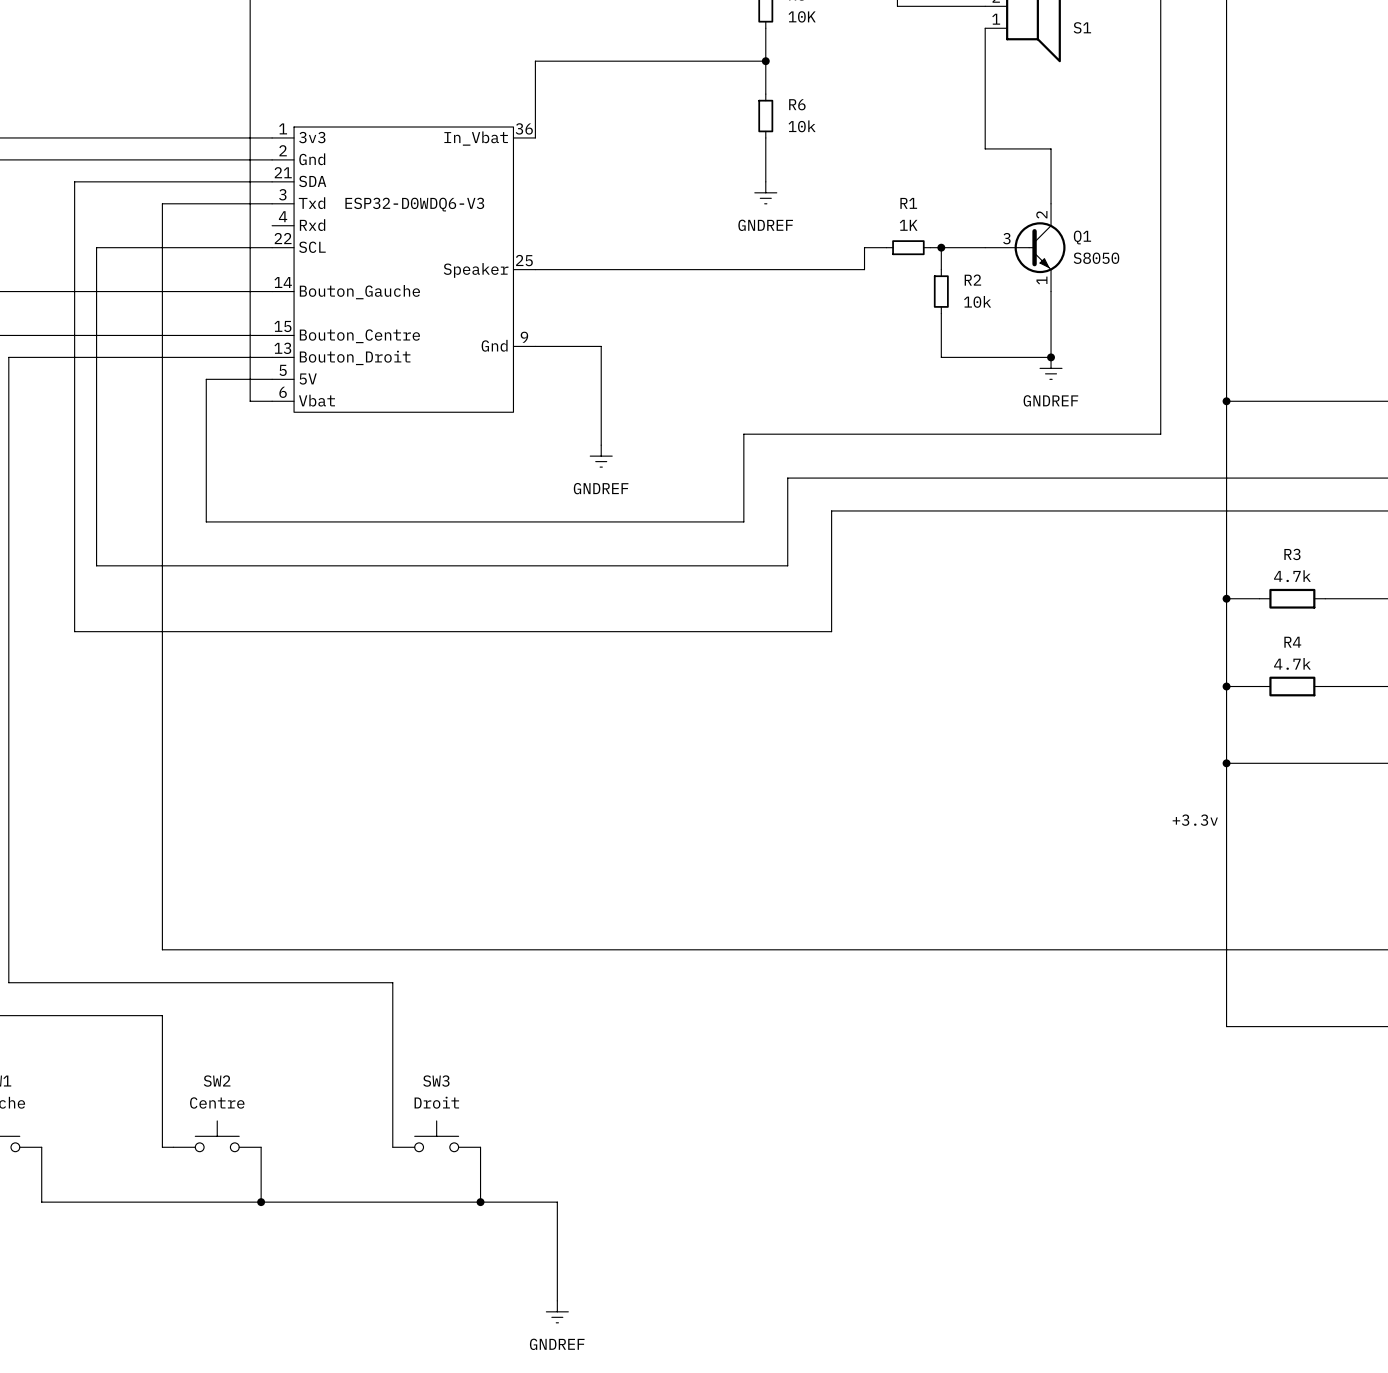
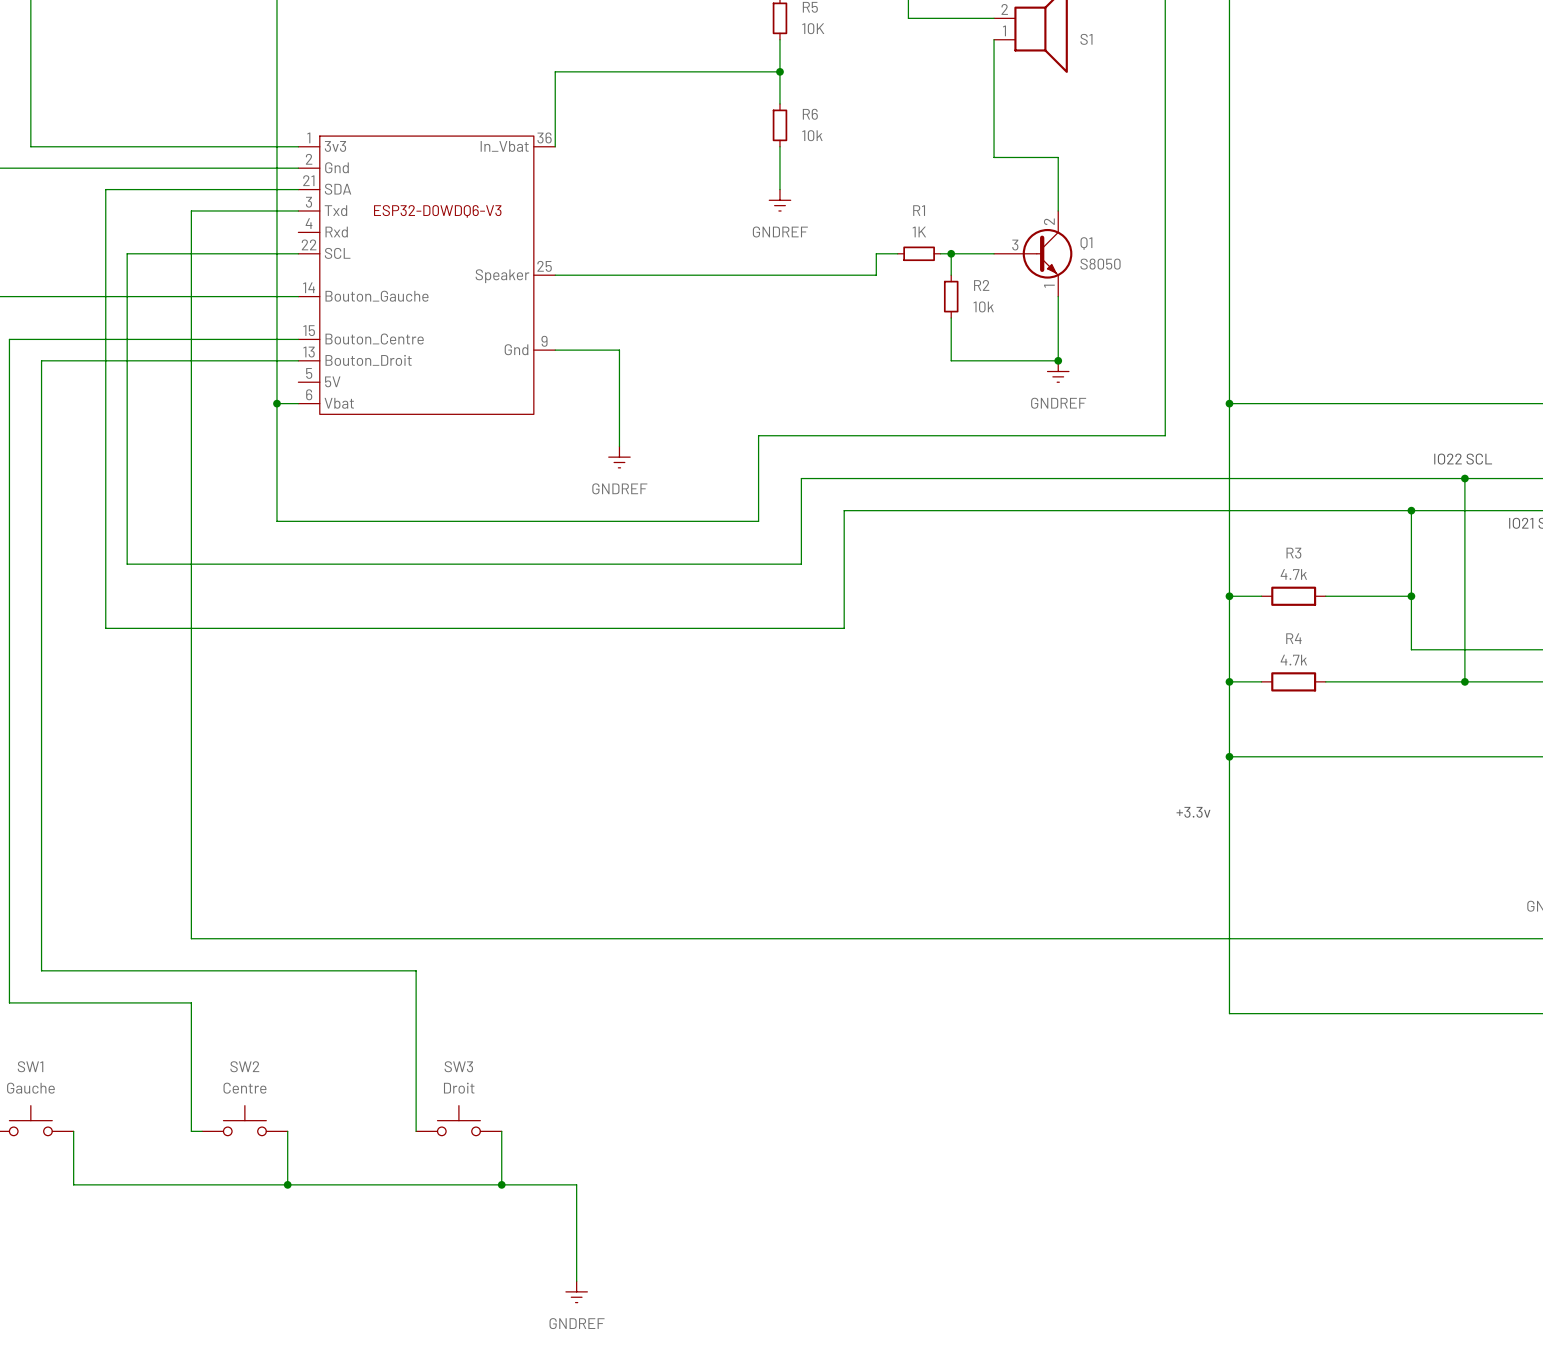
wire: (272, 379) (206, 379) (206, 521) (250, 521) -> (276, 403) (276, 521)
junction: none -> (276, 403)

